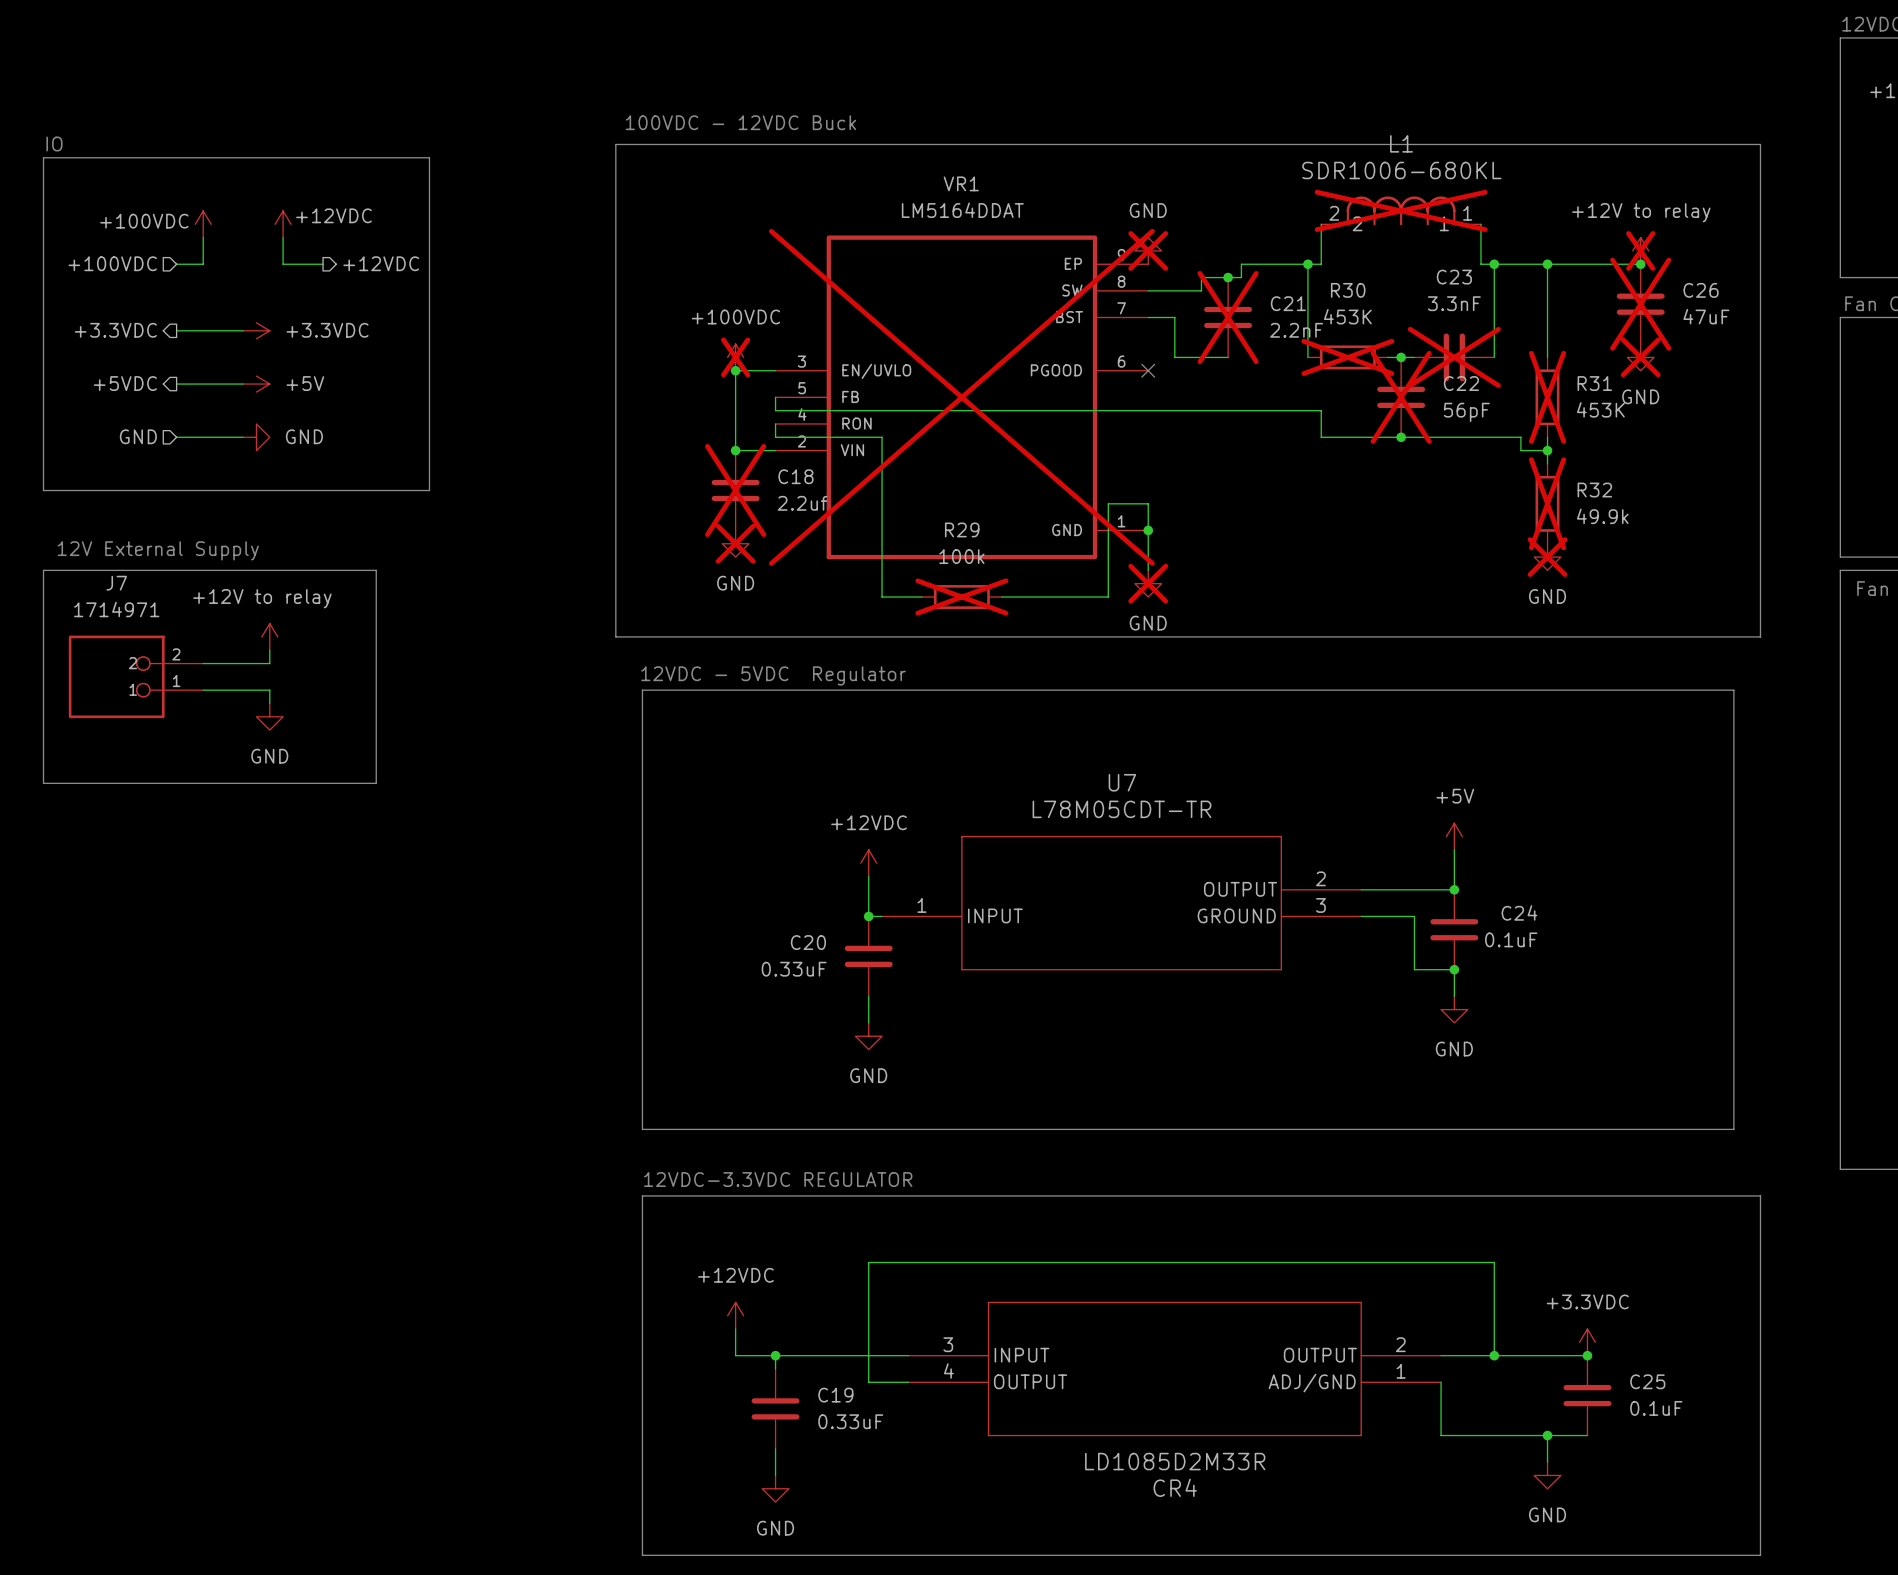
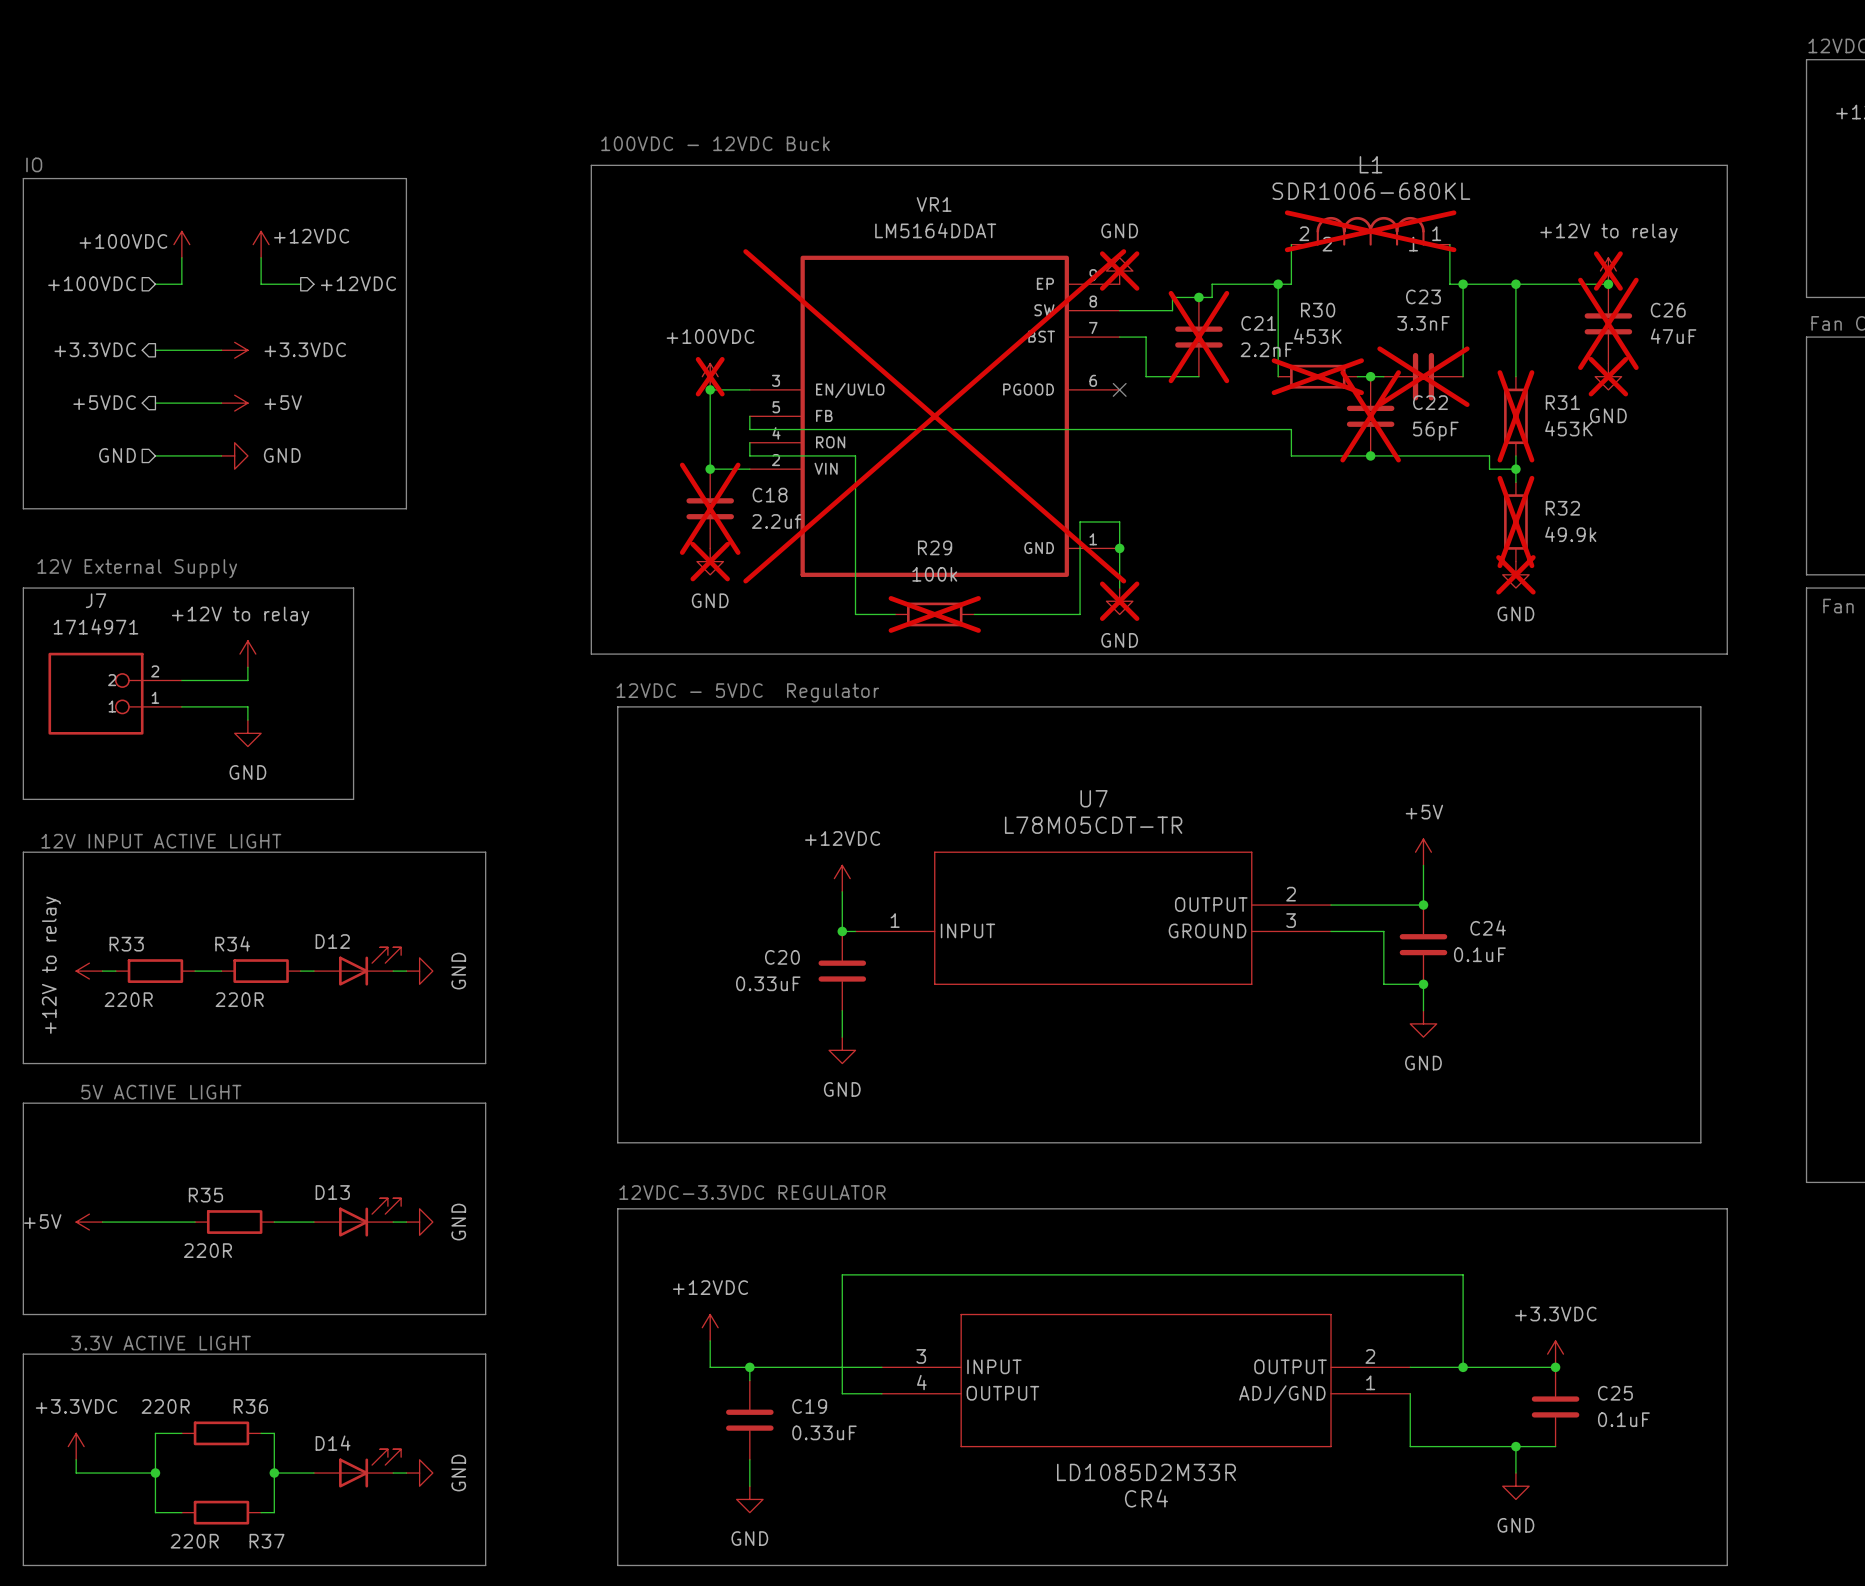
text: none -> 12V INPUT ACTIVE LIGHT (161, 841)
line: none -> (23, 852) (485, 852) (485, 1063) (23, 1063) (23, 852)
D12: none -> (357, 966)
power symbol: none -> +12V to relay (89, 971)
wire: none -> (102, 971) (115, 971)
R33: none -> 220R (155, 971)
wire: none -> (195, 971) (221, 971)
R34: none -> 220R (261, 971)
wire: none -> (300, 971) (313, 971)
wire: none -> (393, 971) (406, 971)
power symbol: none -> GND (419, 971)
text: none -> 5V ACTIVE LIGHT (161, 1092)
line: none -> (23, 1103) (23, 1314) (485, 1314) (485, 1103) (23, 1103)
D13: none -> (357, 1217)
power symbol: none -> +5V (89, 1222)
wire: none -> (102, 1222) (195, 1222)
R35: none -> 220R (234, 1222)
wire: none -> (274, 1222) (313, 1222)
wire: none -> (393, 1222) (406, 1222)
power symbol: none -> GND (419, 1222)
text: none -> 3.3V ACTIVE LIGHT (161, 1343)
line: none -> (23, 1354) (23, 1565) (485, 1565) (485, 1354) (23, 1354)
wire: none -> (181, 1433) (155, 1433) (155, 1512) (181, 1512)
R36: none -> 220R (221, 1433)
wire: none -> (261, 1433) (274, 1433) (274, 1512) (261, 1512)
power symbol: none -> +3.3VDC (76, 1446)
wire: none -> (76, 1459) (76, 1473) (155, 1473)
D14: none -> (357, 1468)
junction: none -> (155, 1473)
wire: none -> (274, 1473) (313, 1473)
junction: none -> (274, 1473)
wire: none -> (393, 1473) (406, 1473)
power symbol: none -> GND (419, 1473)
R37: none -> 220R (221, 1512)

